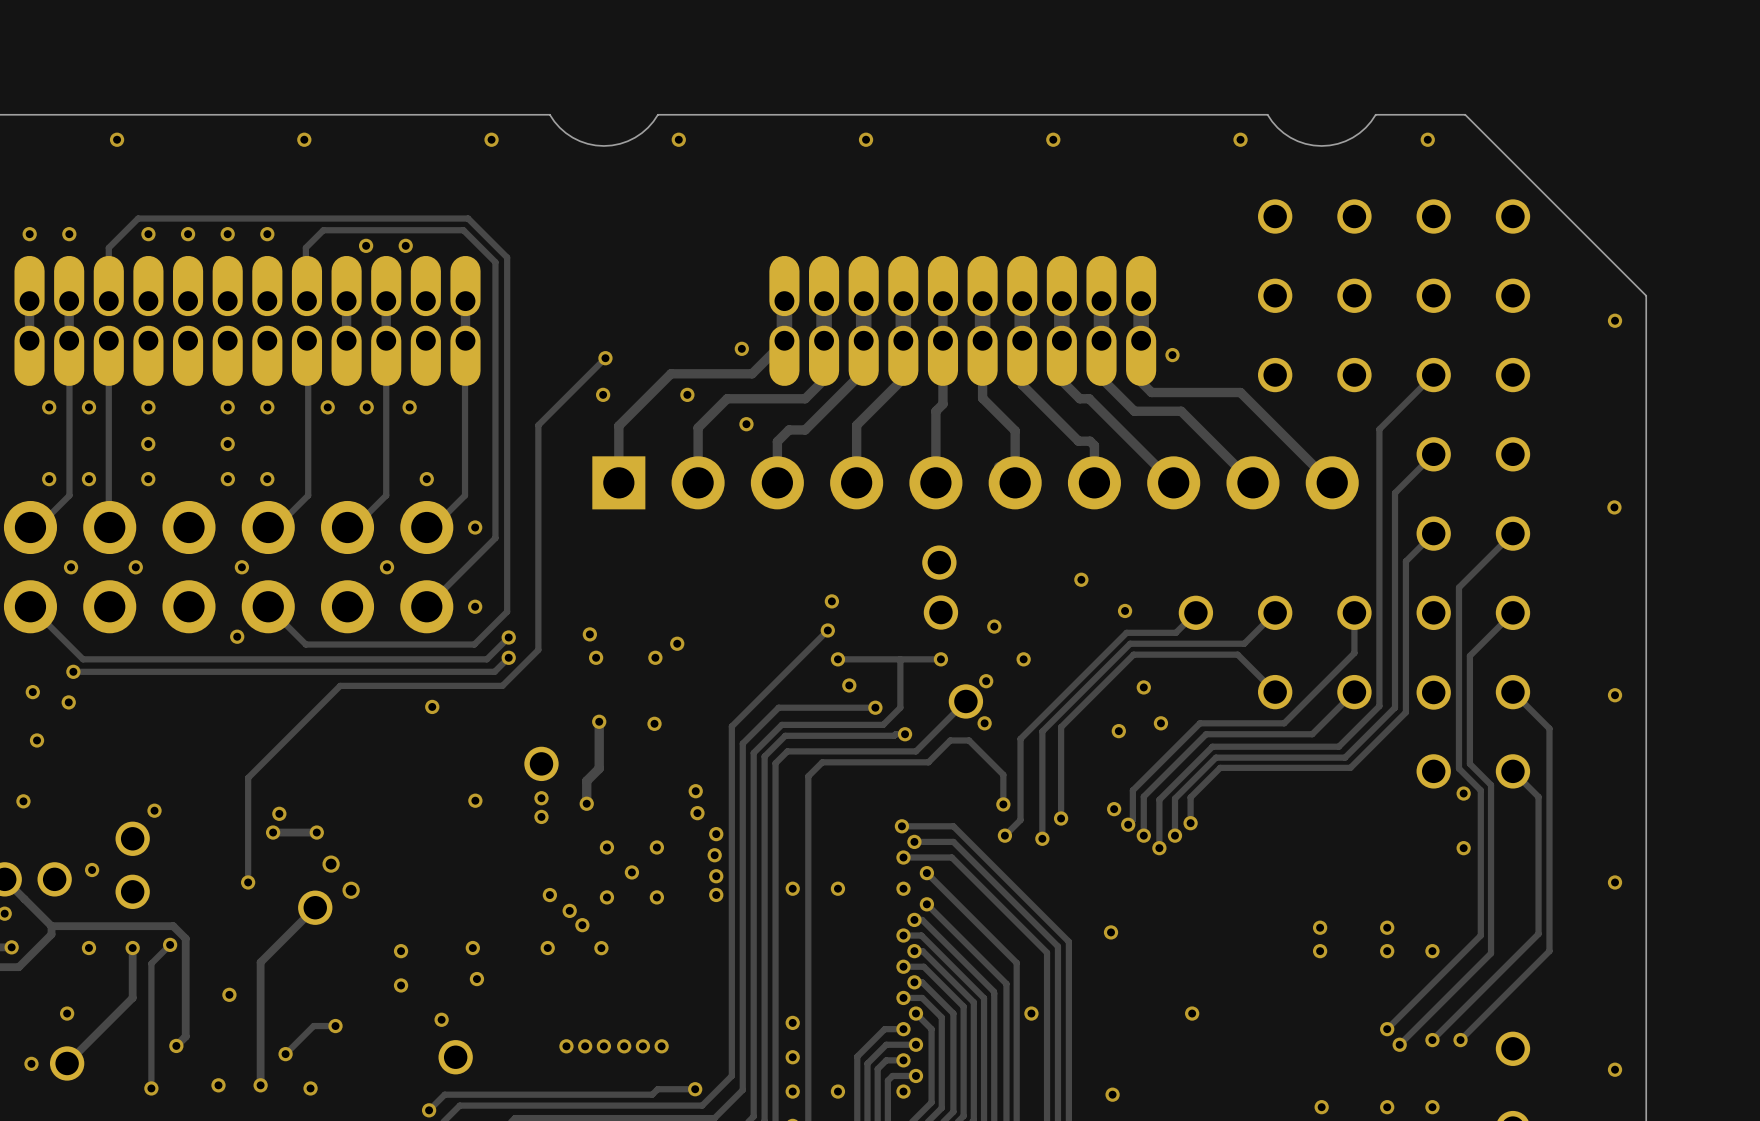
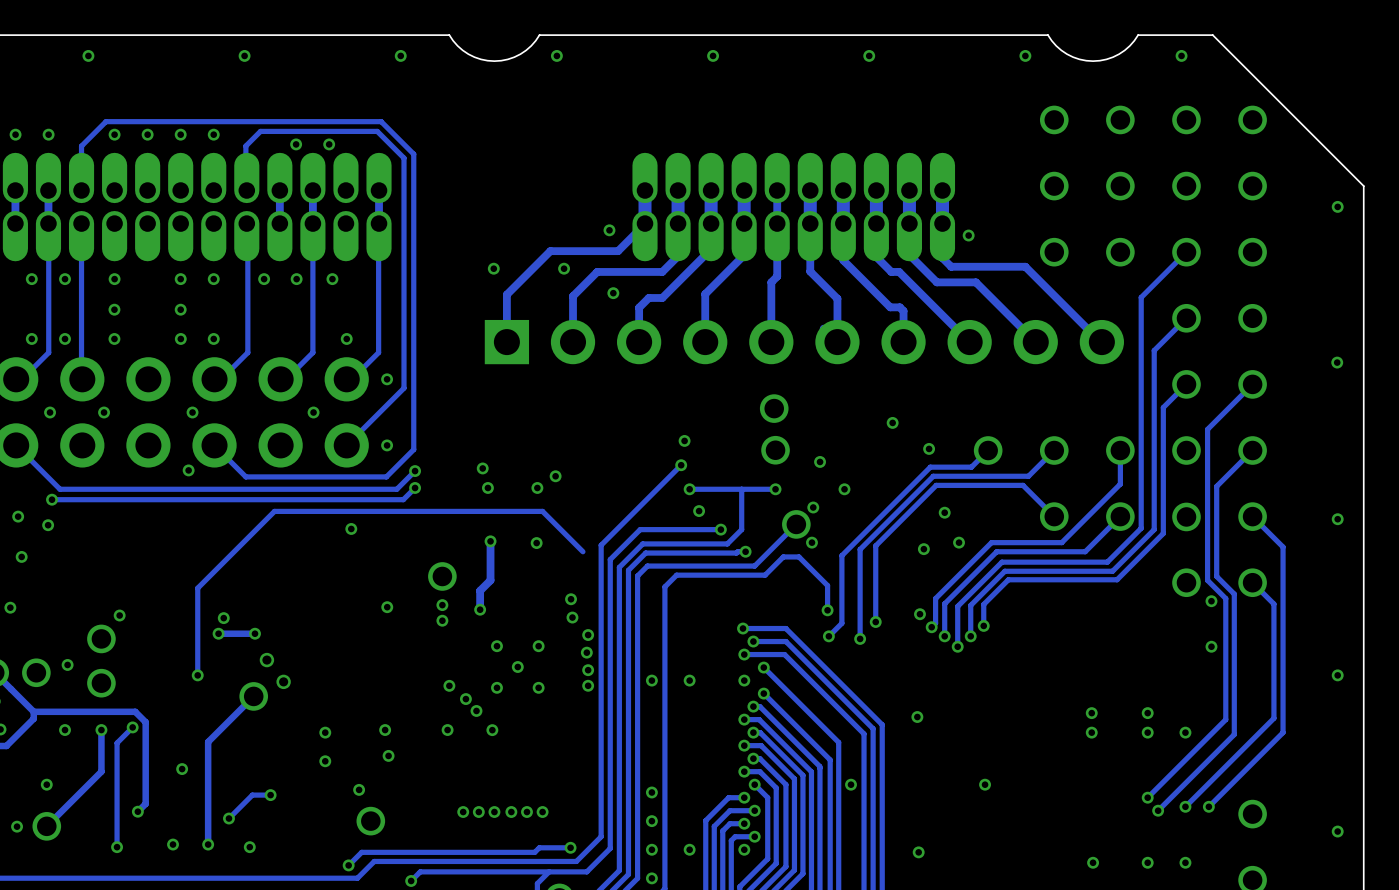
track: (605, 358) (538, 425) (538, 649) (502, 685) -> (582, 551) (542, 511) (409, 511)
via: (605, 358) -> none

